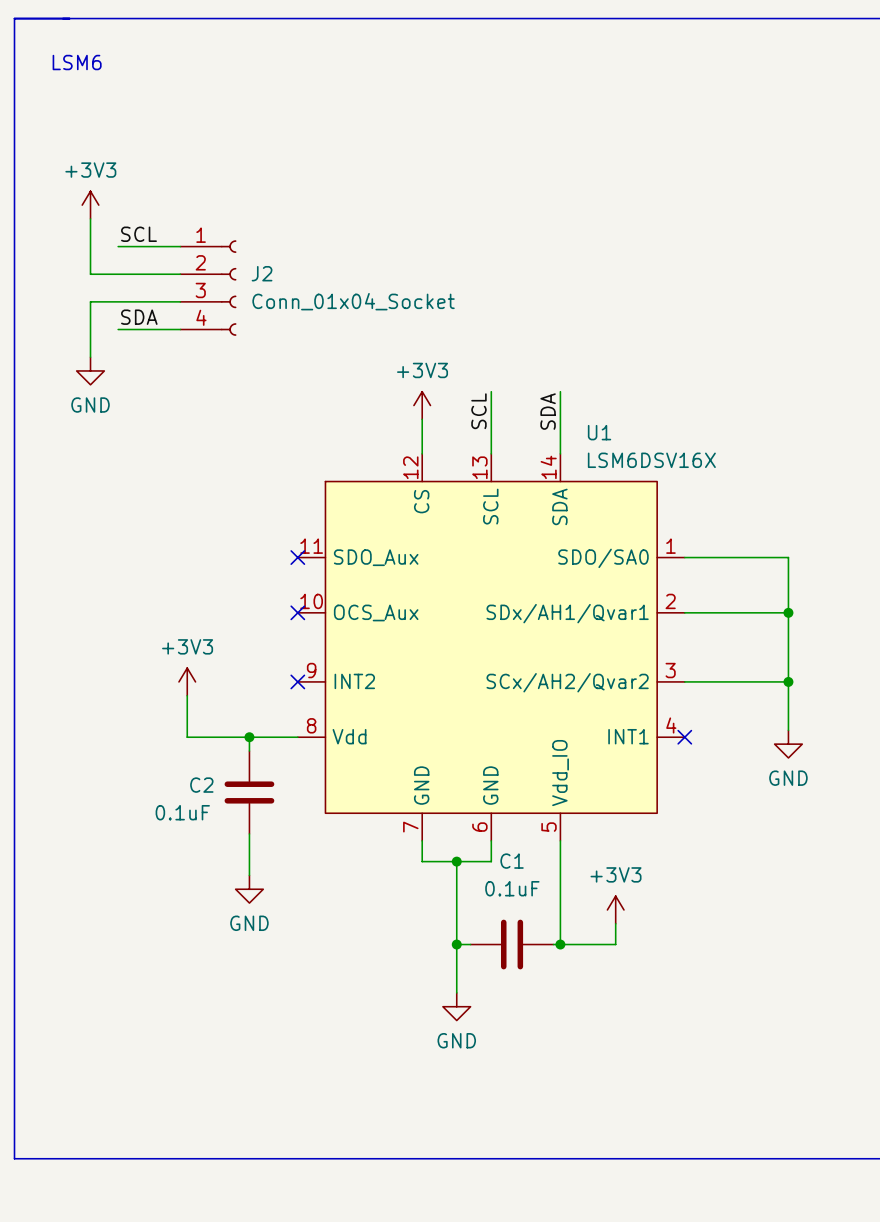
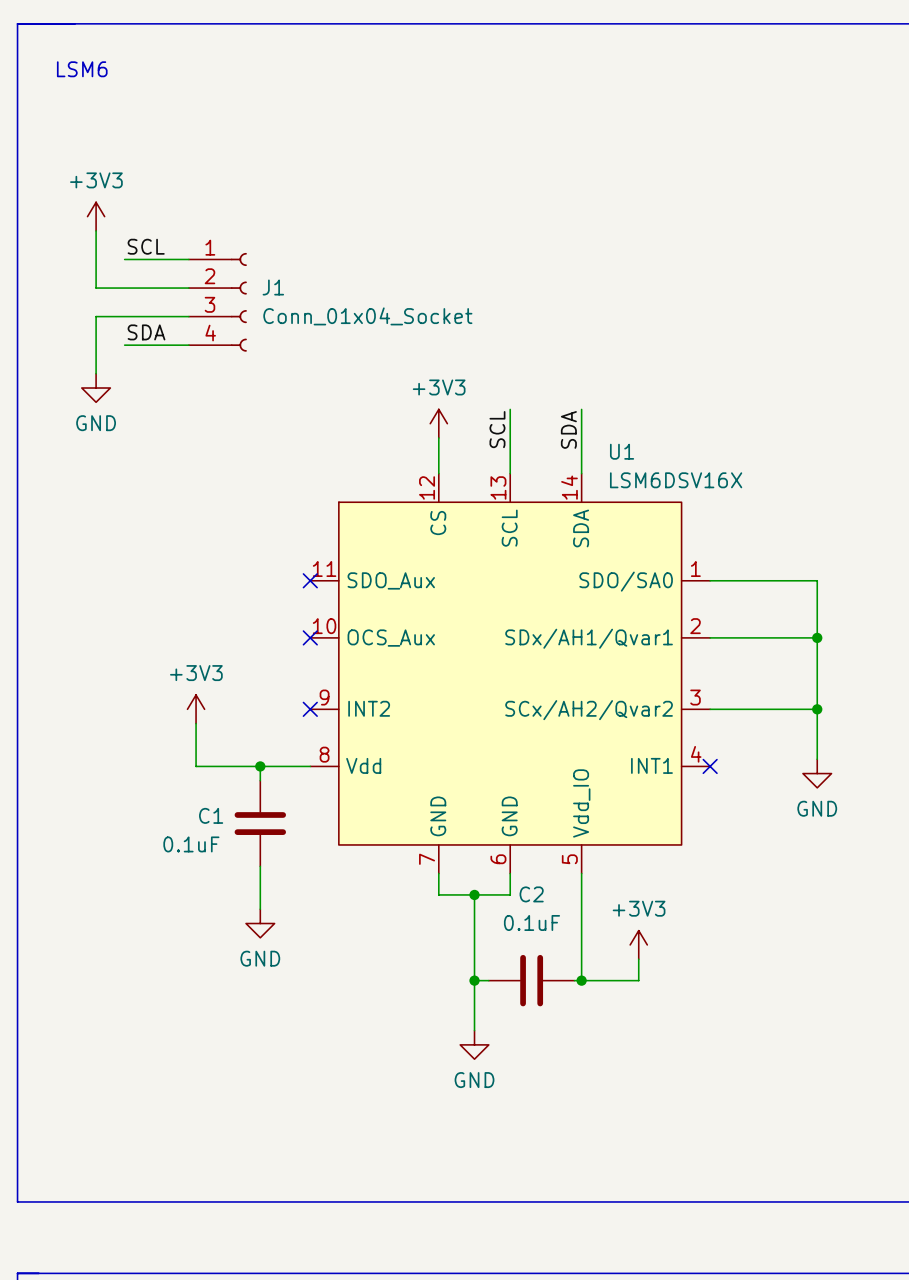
J2 name: J2 (262, 273) -> J1 (273, 287)
C2 name: C2 (201, 785) -> C1 (211, 815)
C1 name: C1 (512, 861) -> C2 (531, 894)

